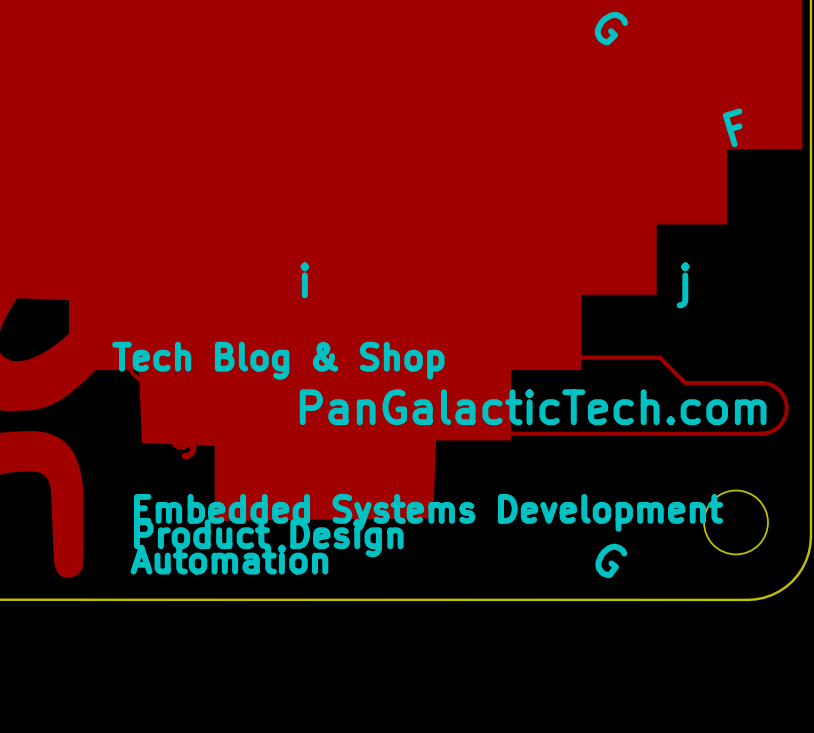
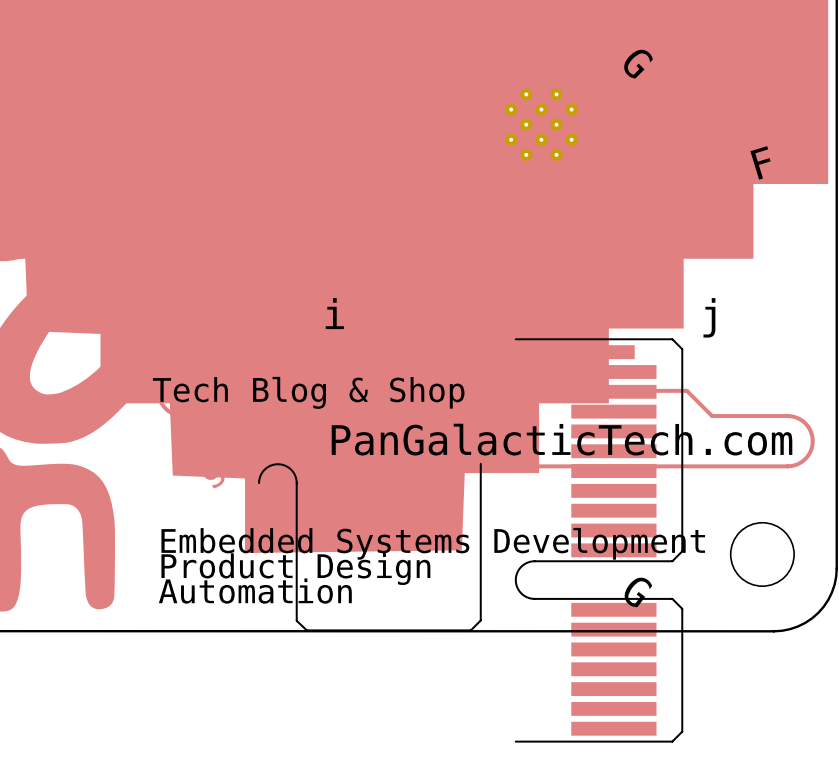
part: none -> (541, 124)
part: none -> (599, 540)
part: none -> (369, 547)

